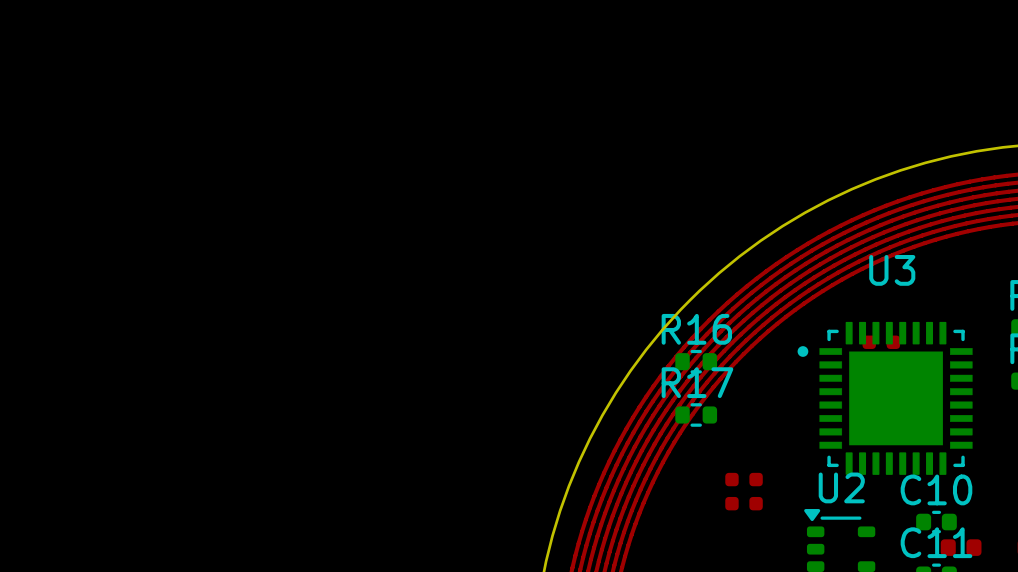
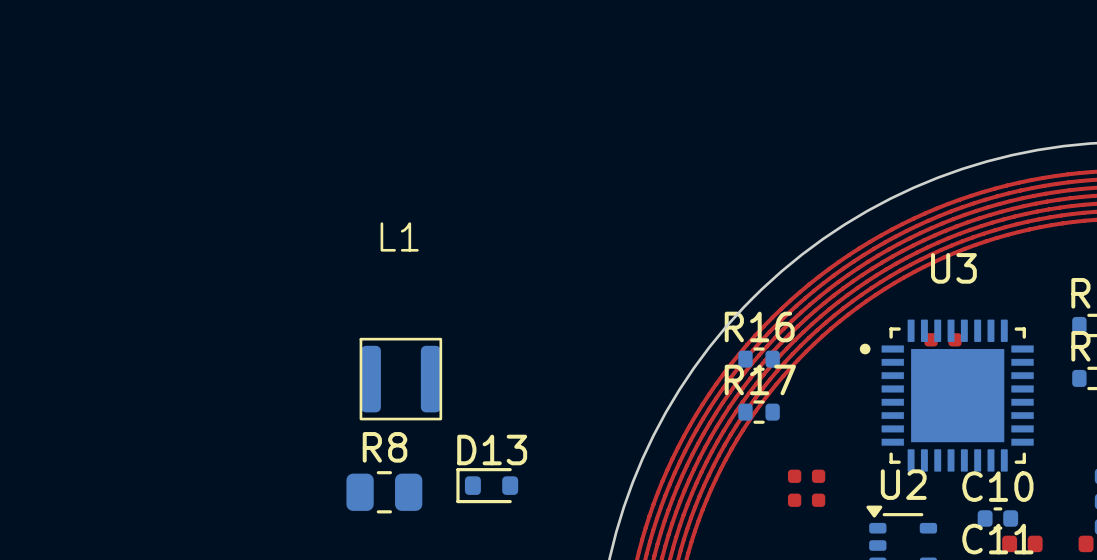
L1: none -> (400, 379)
D13: none -> (487, 485)
R8: none -> (384, 492)

